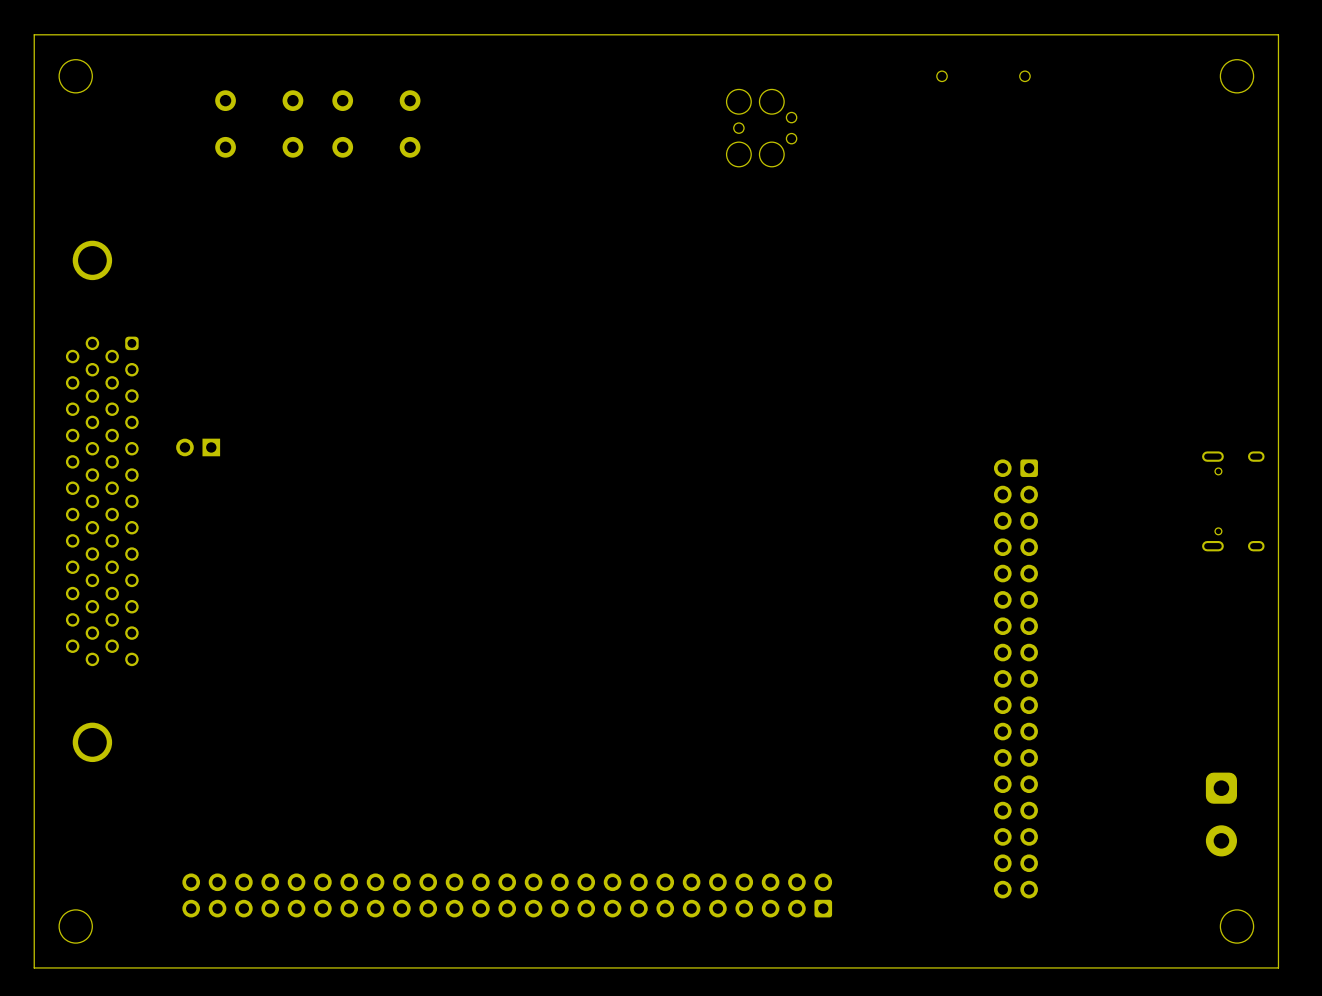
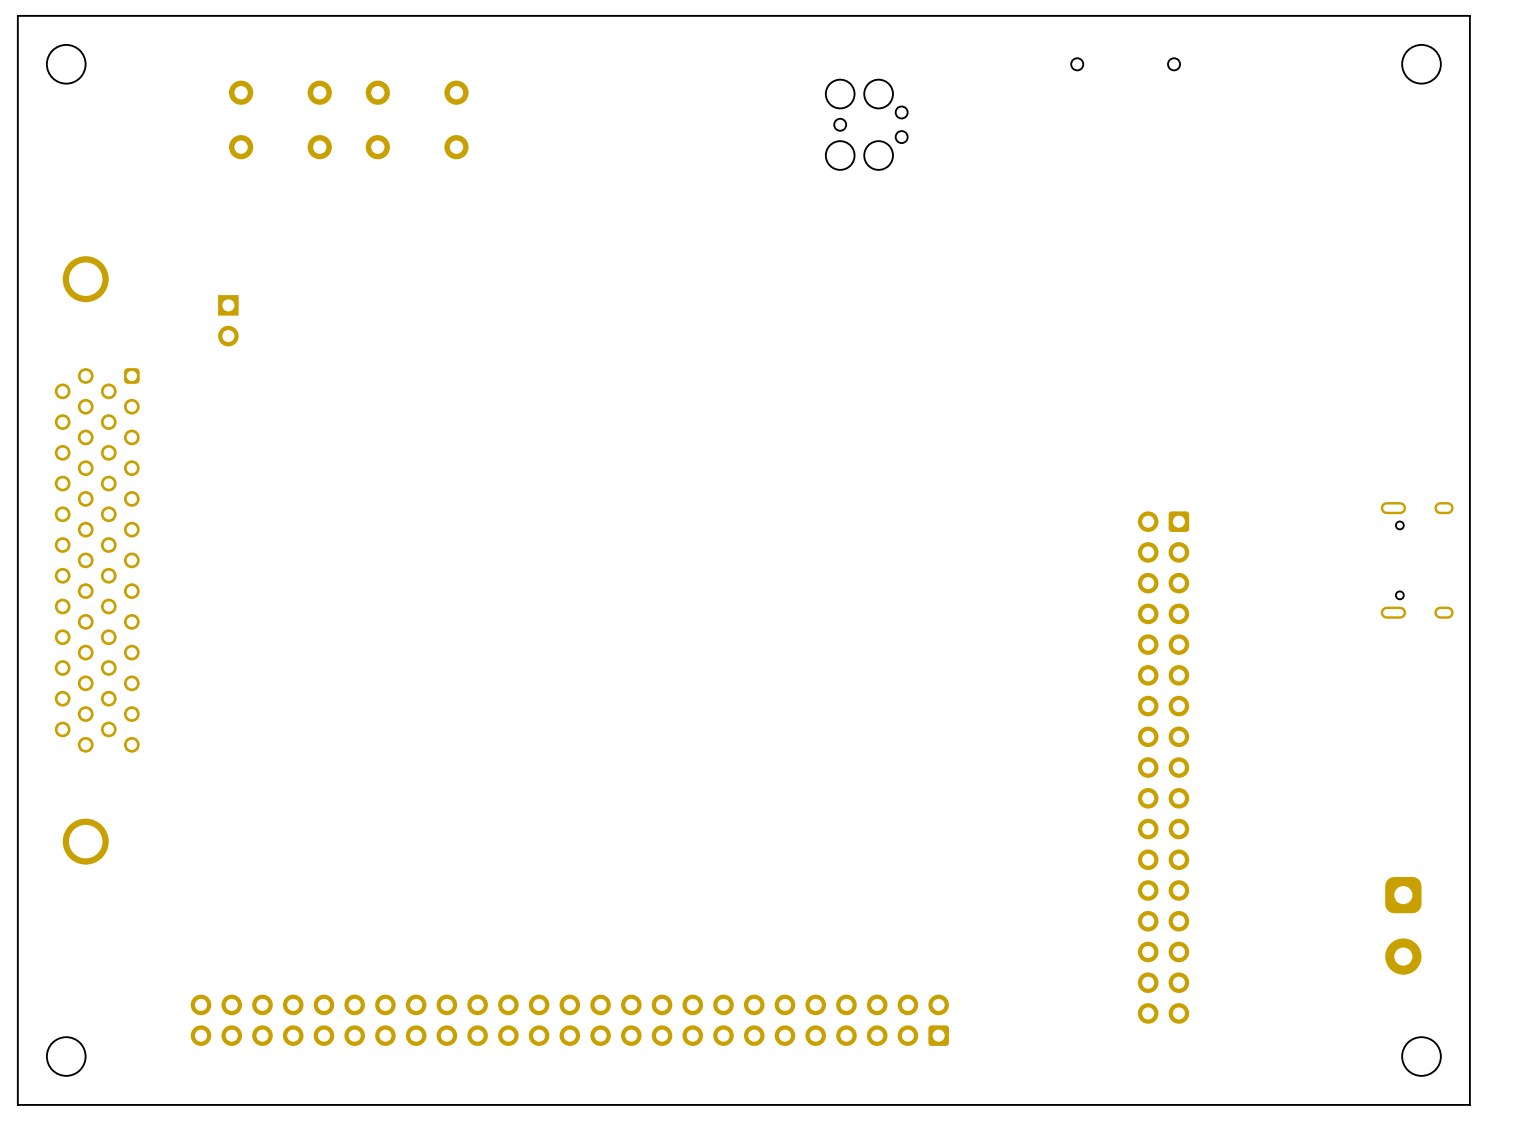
part rotation: 0° (198, 447) -> 90° counterclockwise (228, 320)
part position: (198, 447) -> (228, 320)

